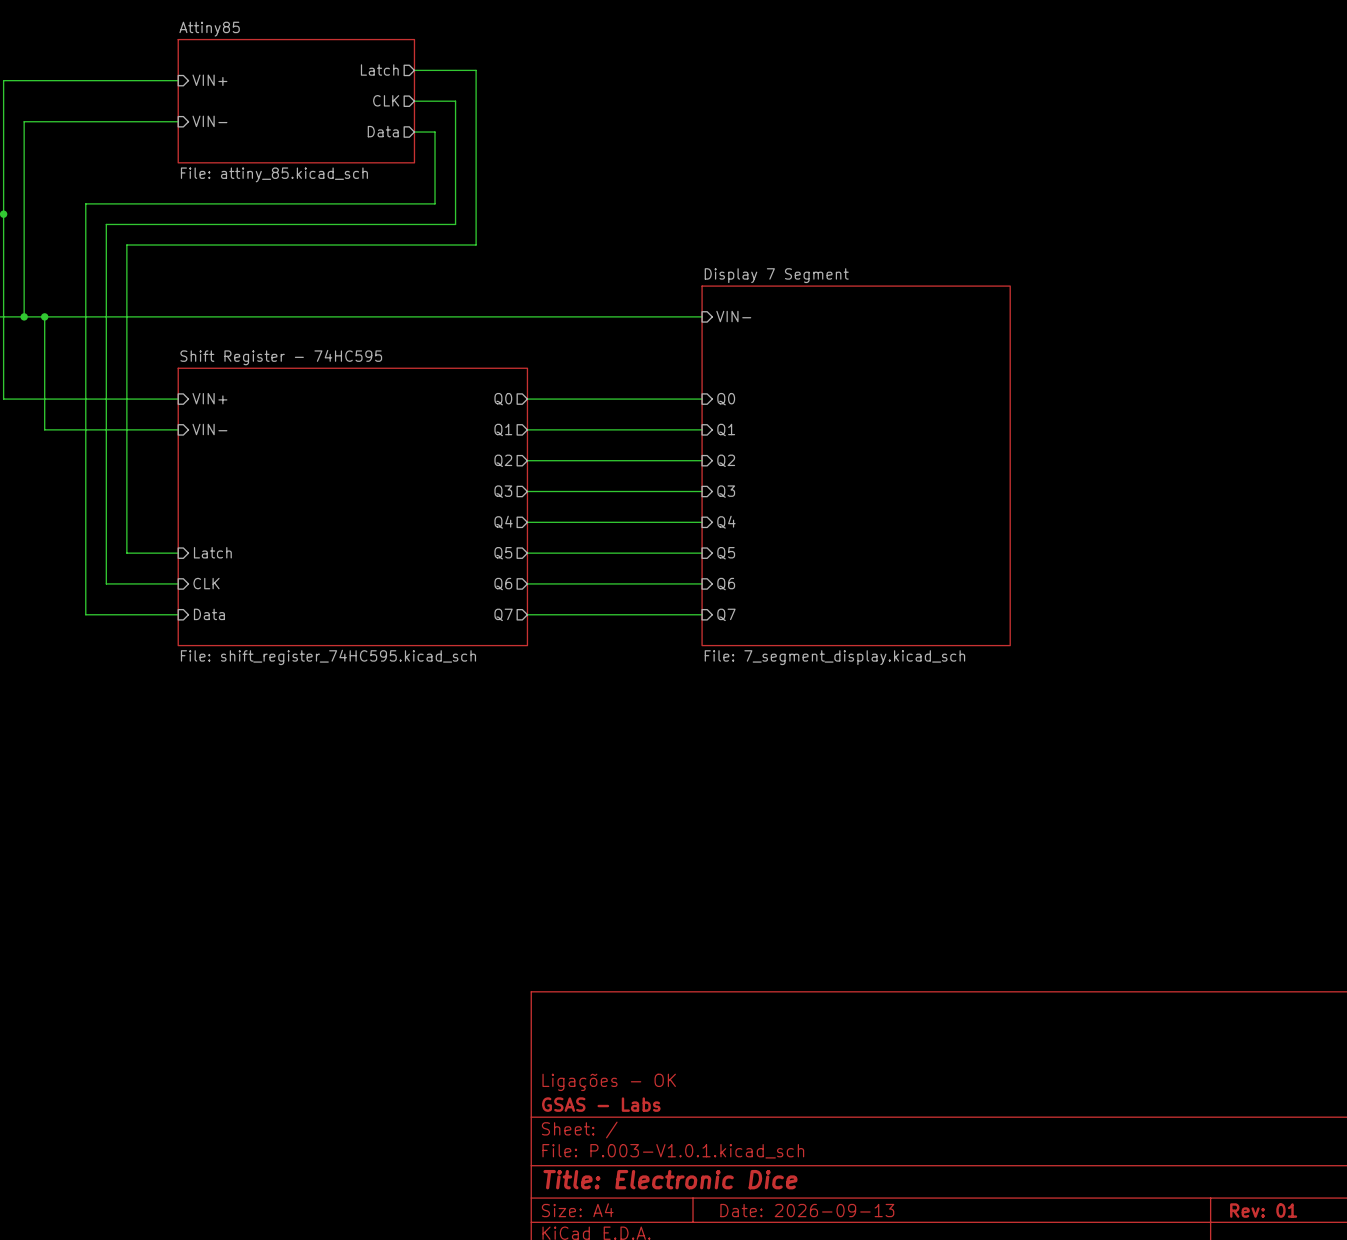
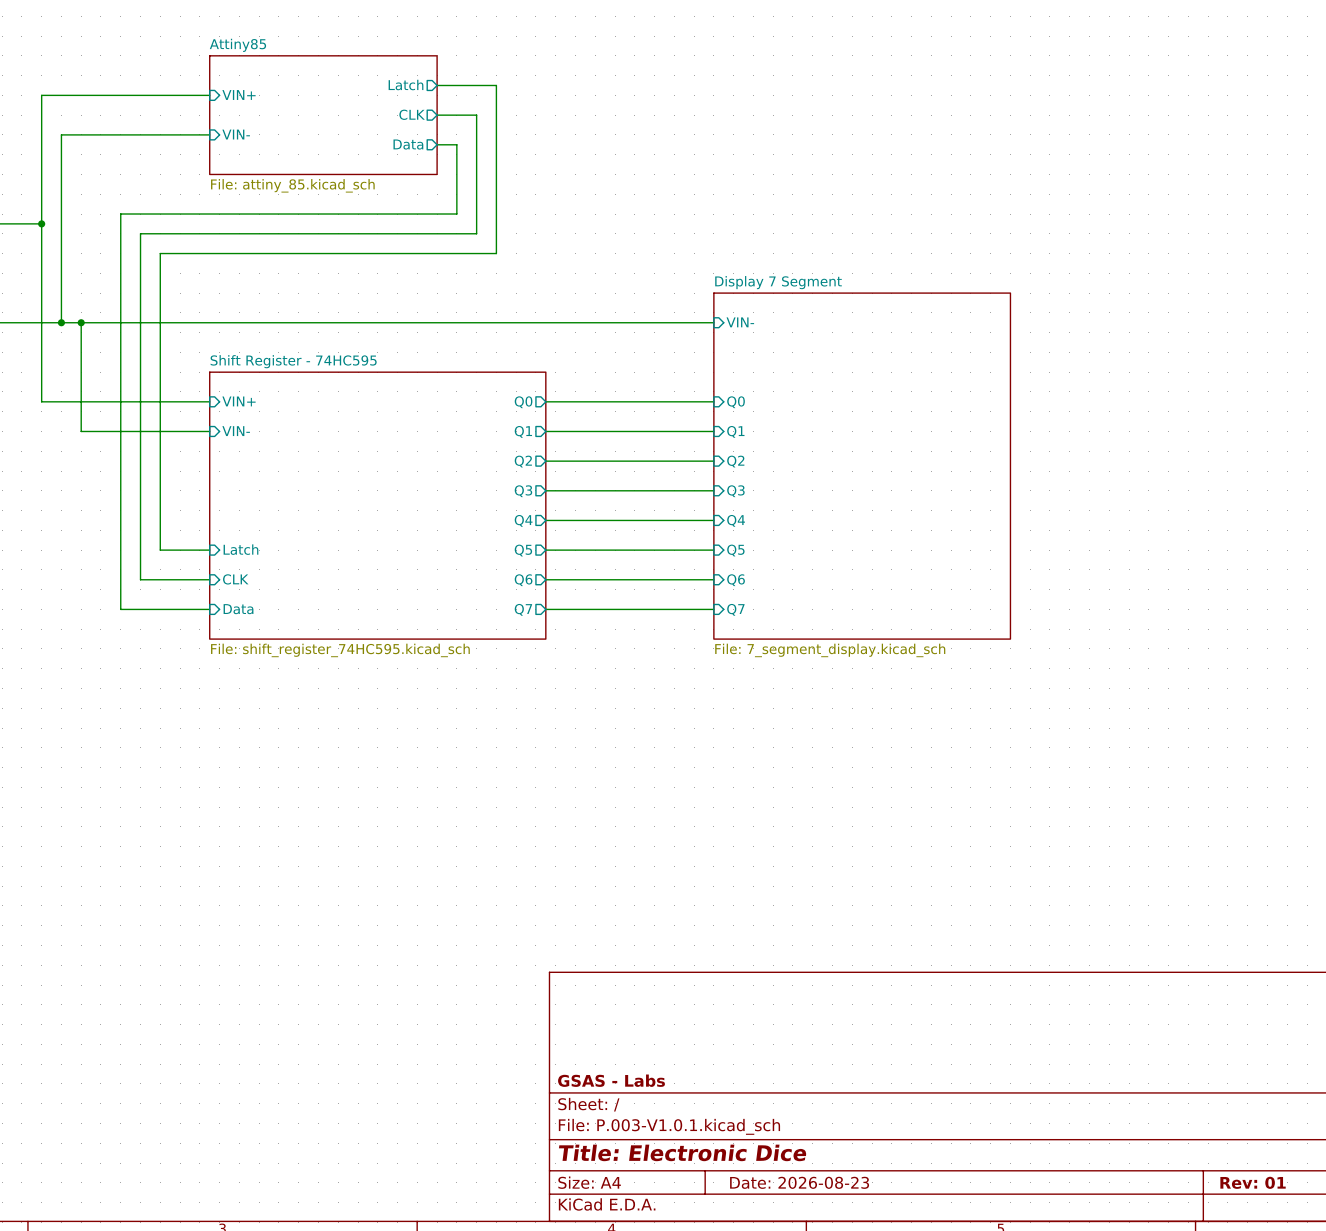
title block: Ligações - OK (609, 1082) -> none
title block: Date: 2026-09-13 (807, 1210) -> Date: 2026-08-23 (799, 1182)

